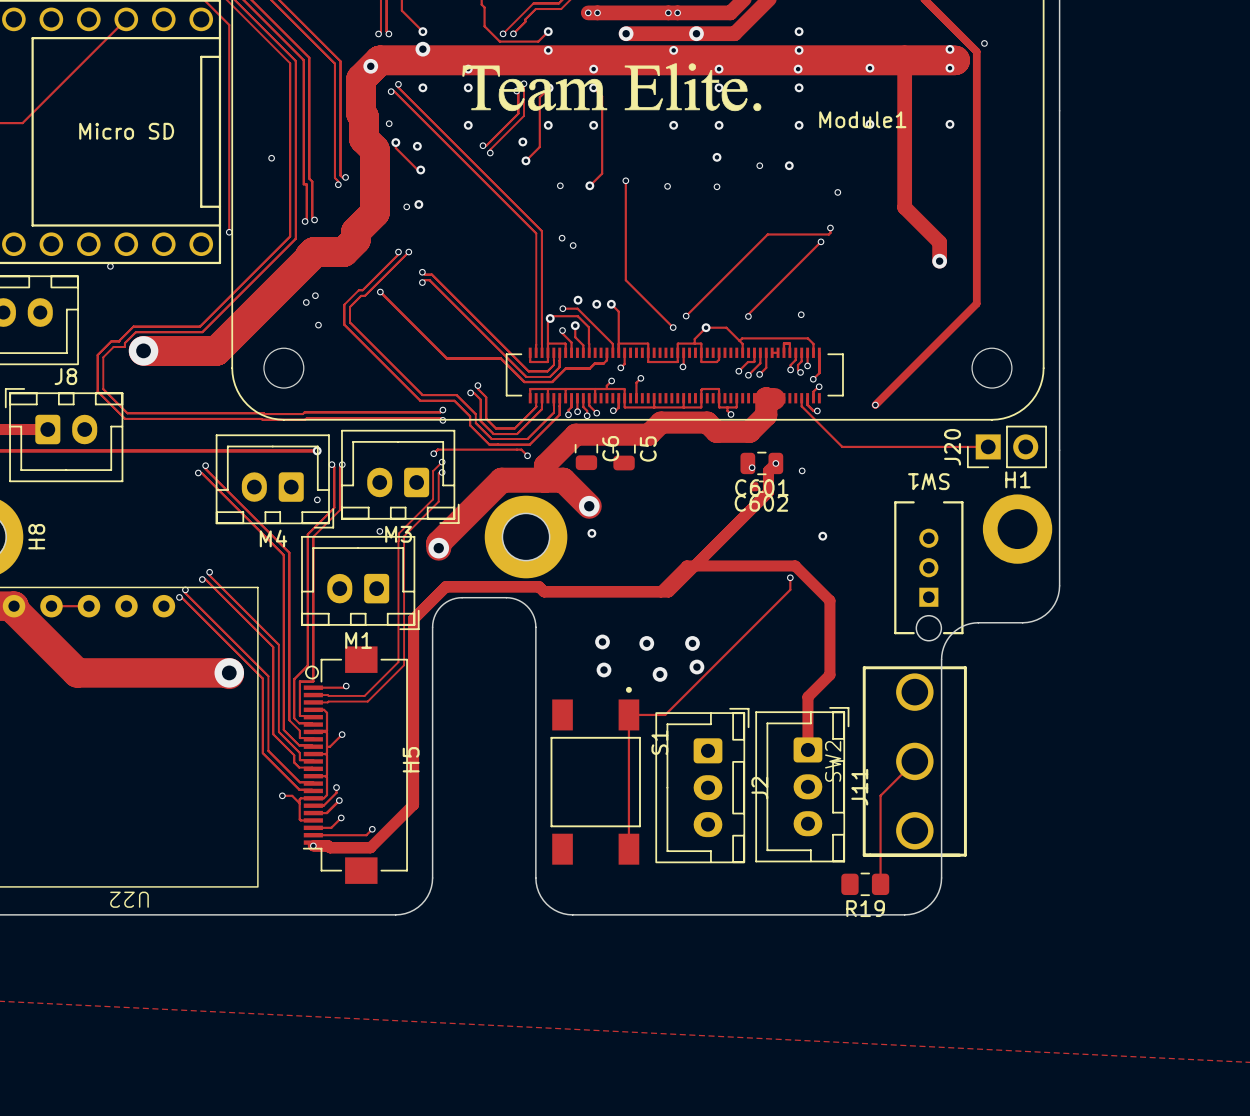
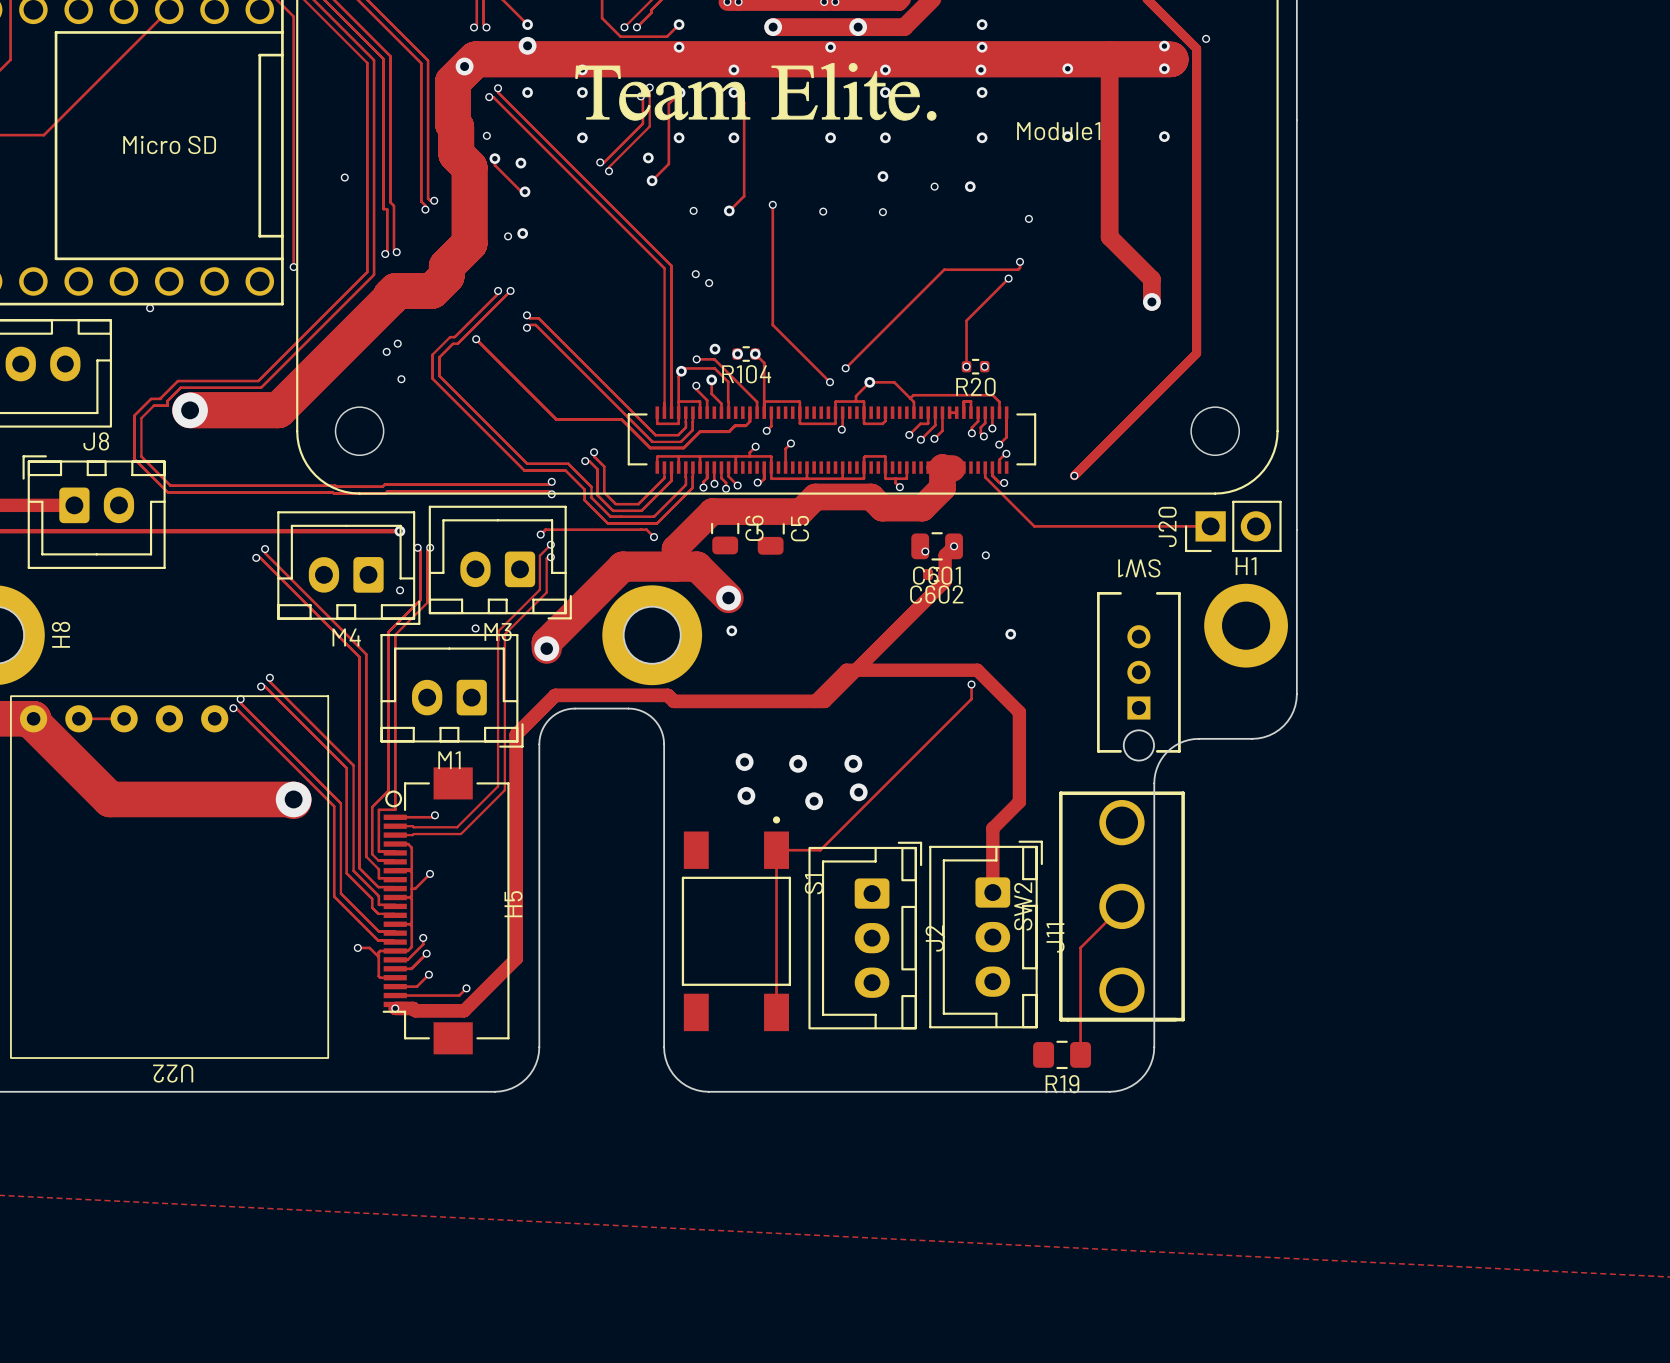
track: (786, 276) (748, 316) -> (966, 320) (966, 366)
R104: none -> (746, 354)
R20: none -> (975, 366)
via position: (748, 316) -> (966, 366)

